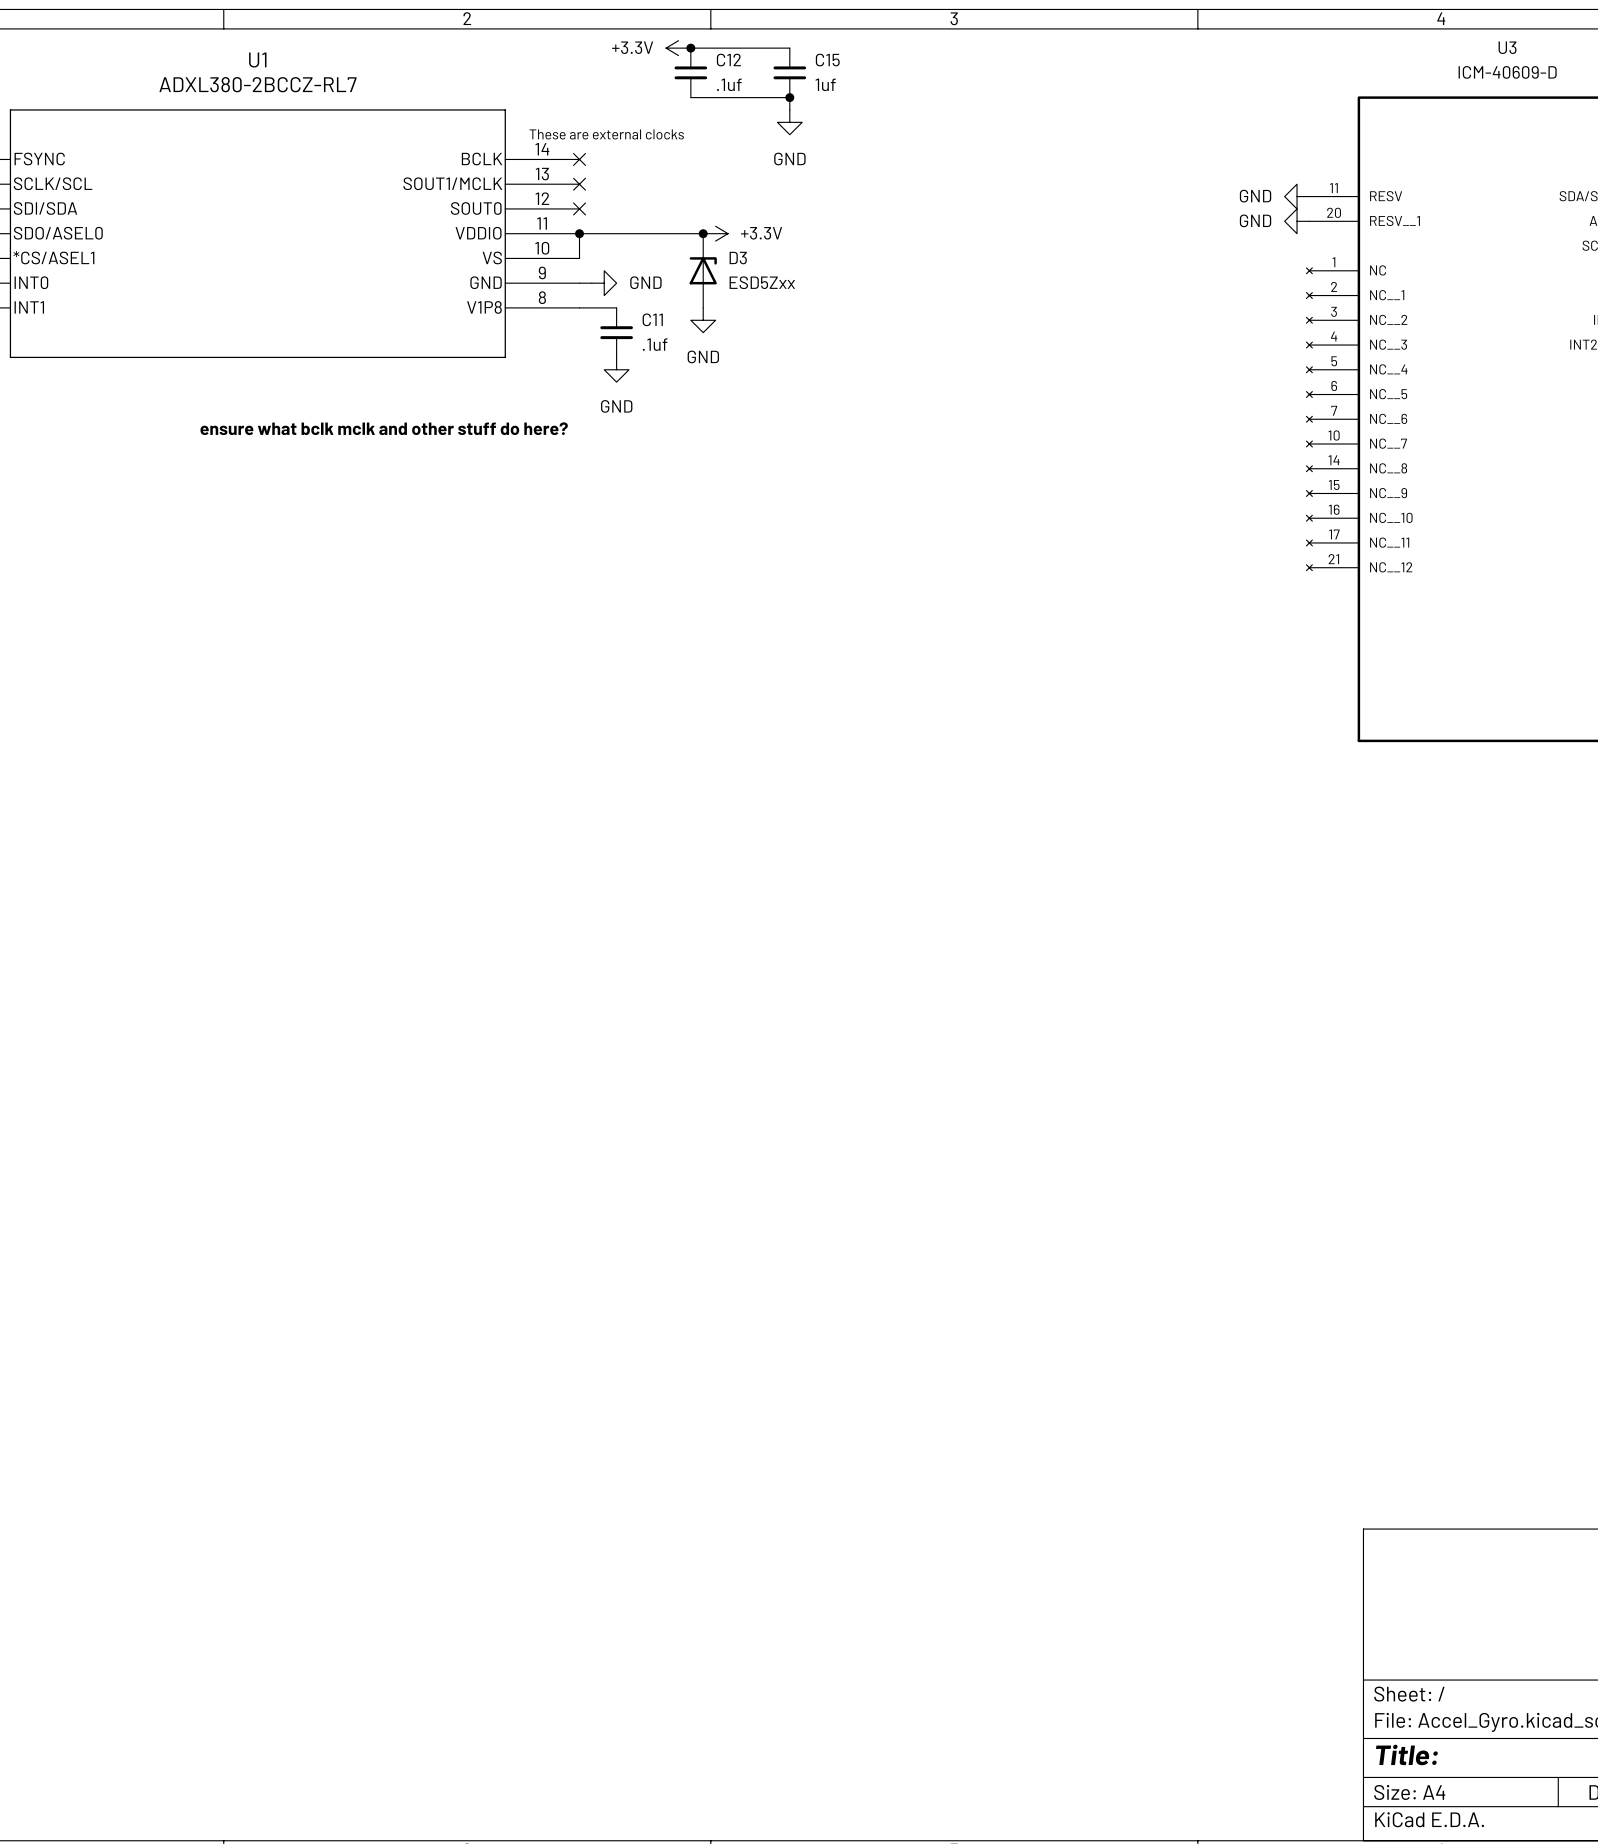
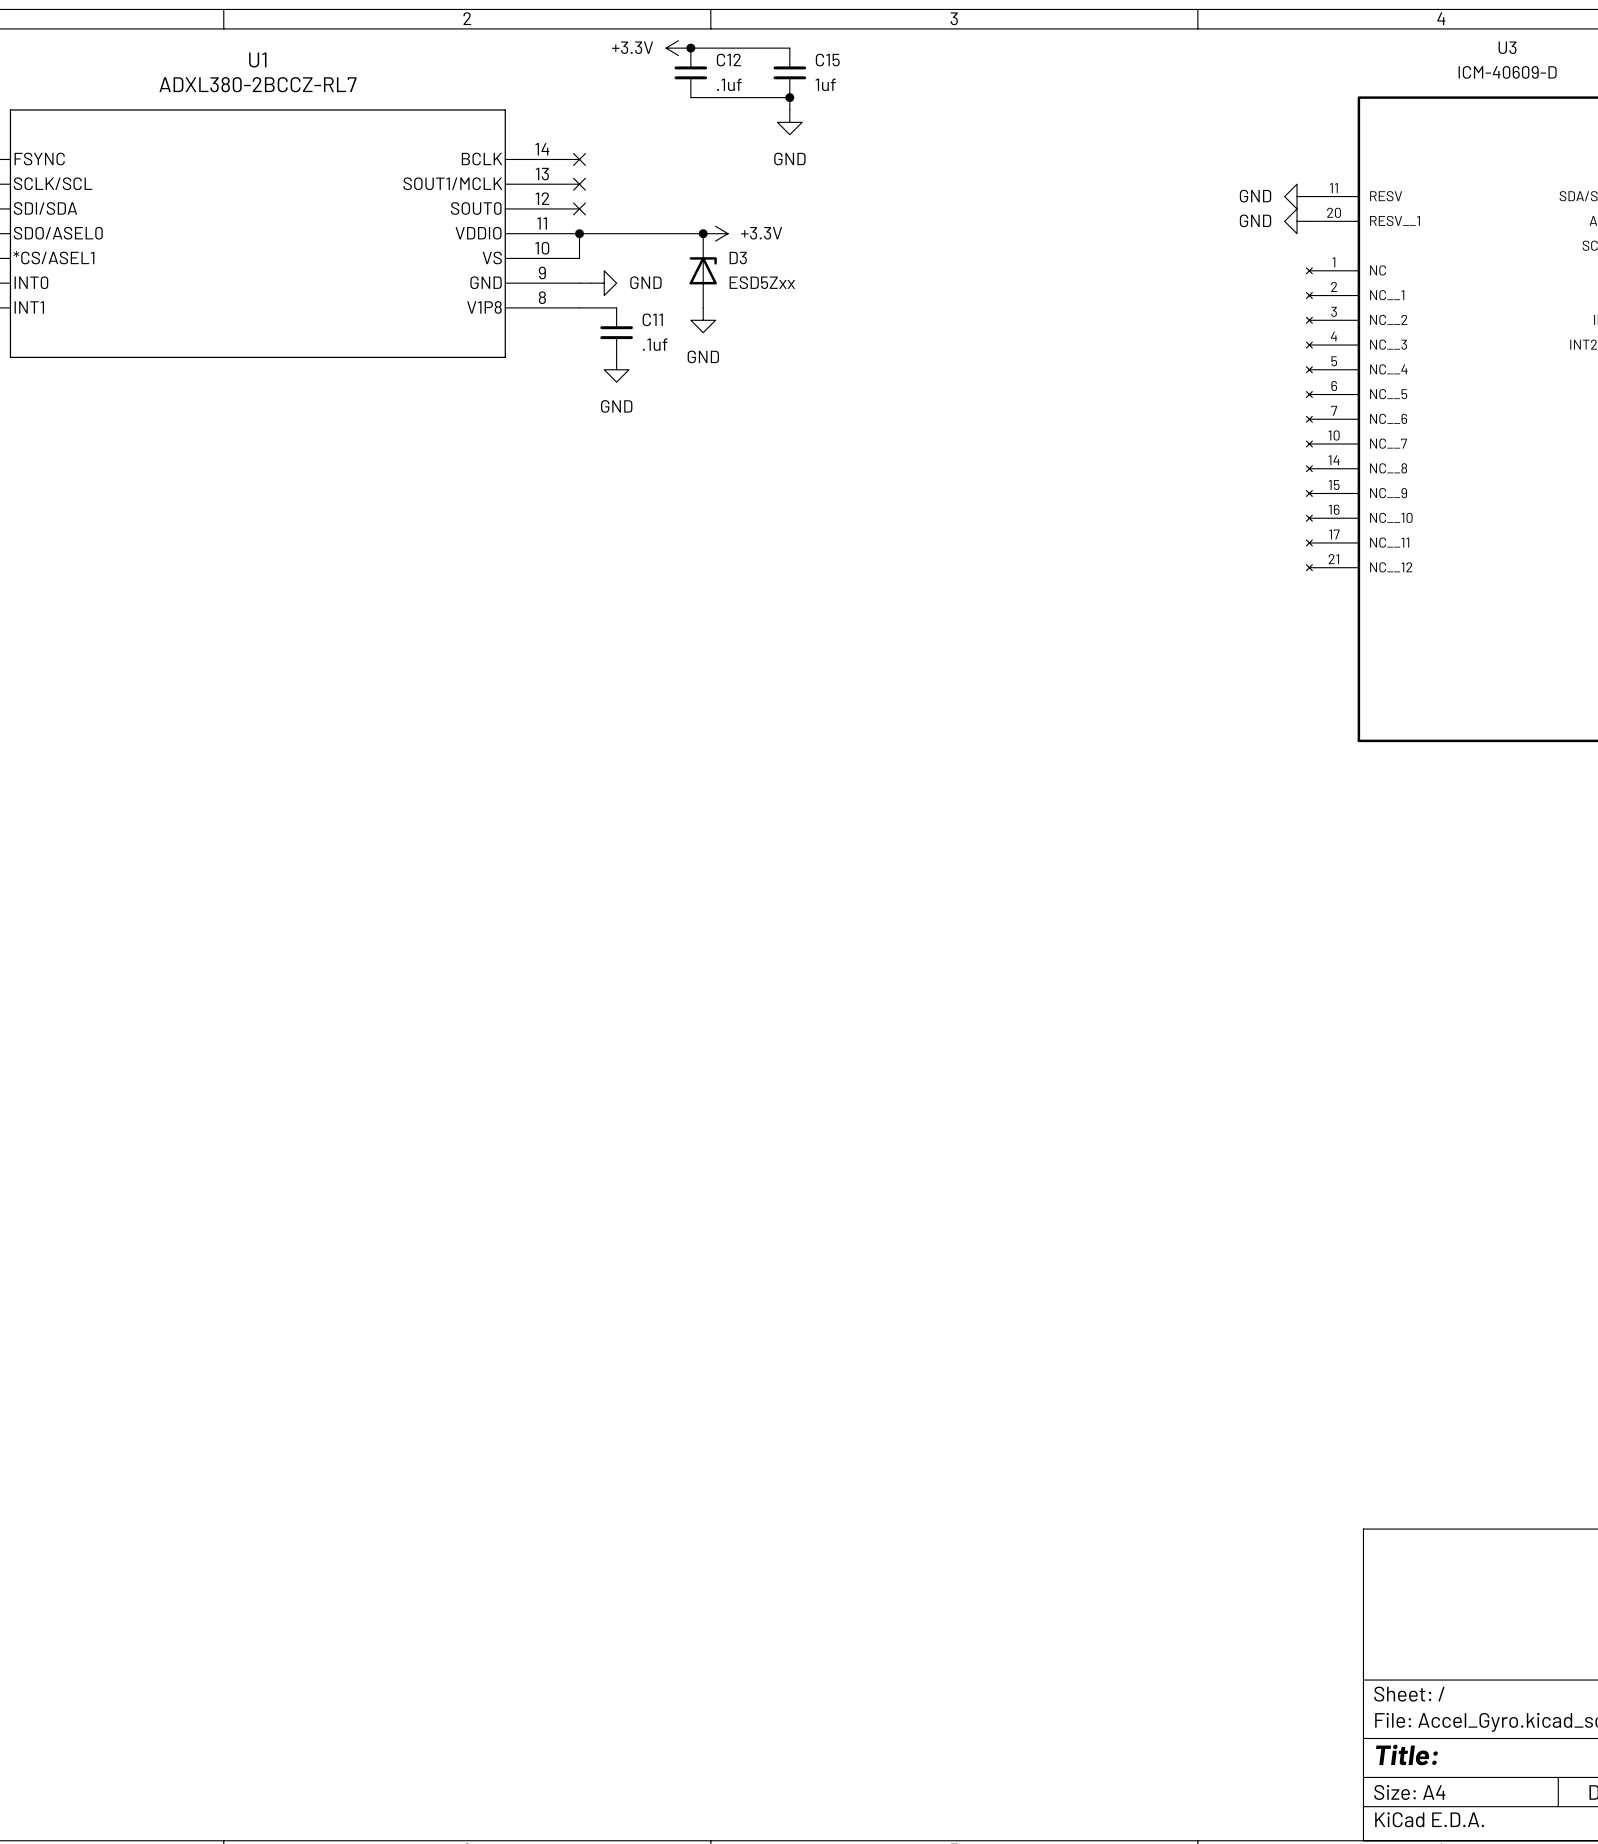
text: These are external clocks (606, 134) -> none
text: ensure what bclk mclk and other stuff do here? (384, 428) -> none

